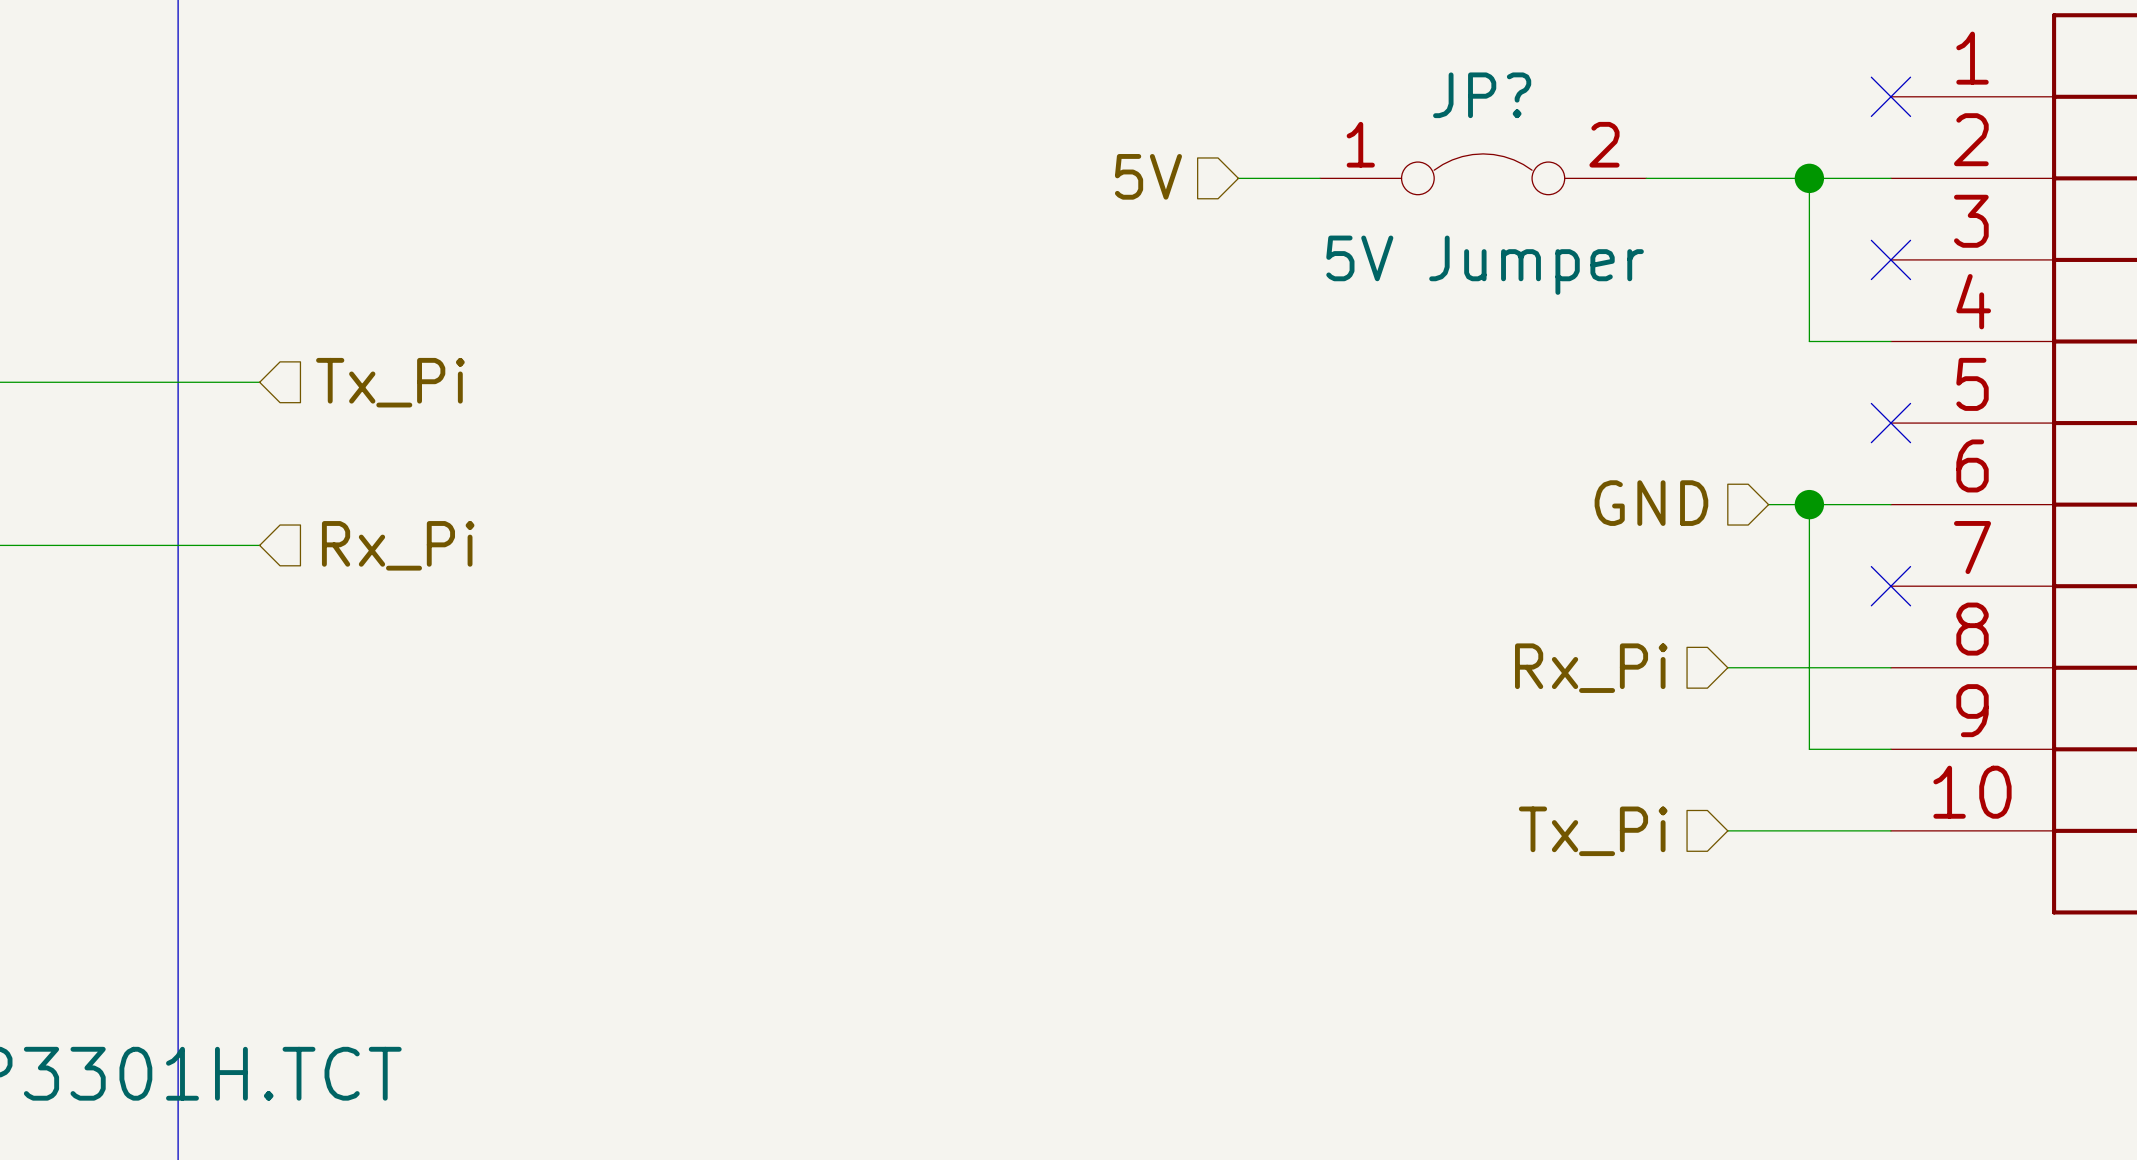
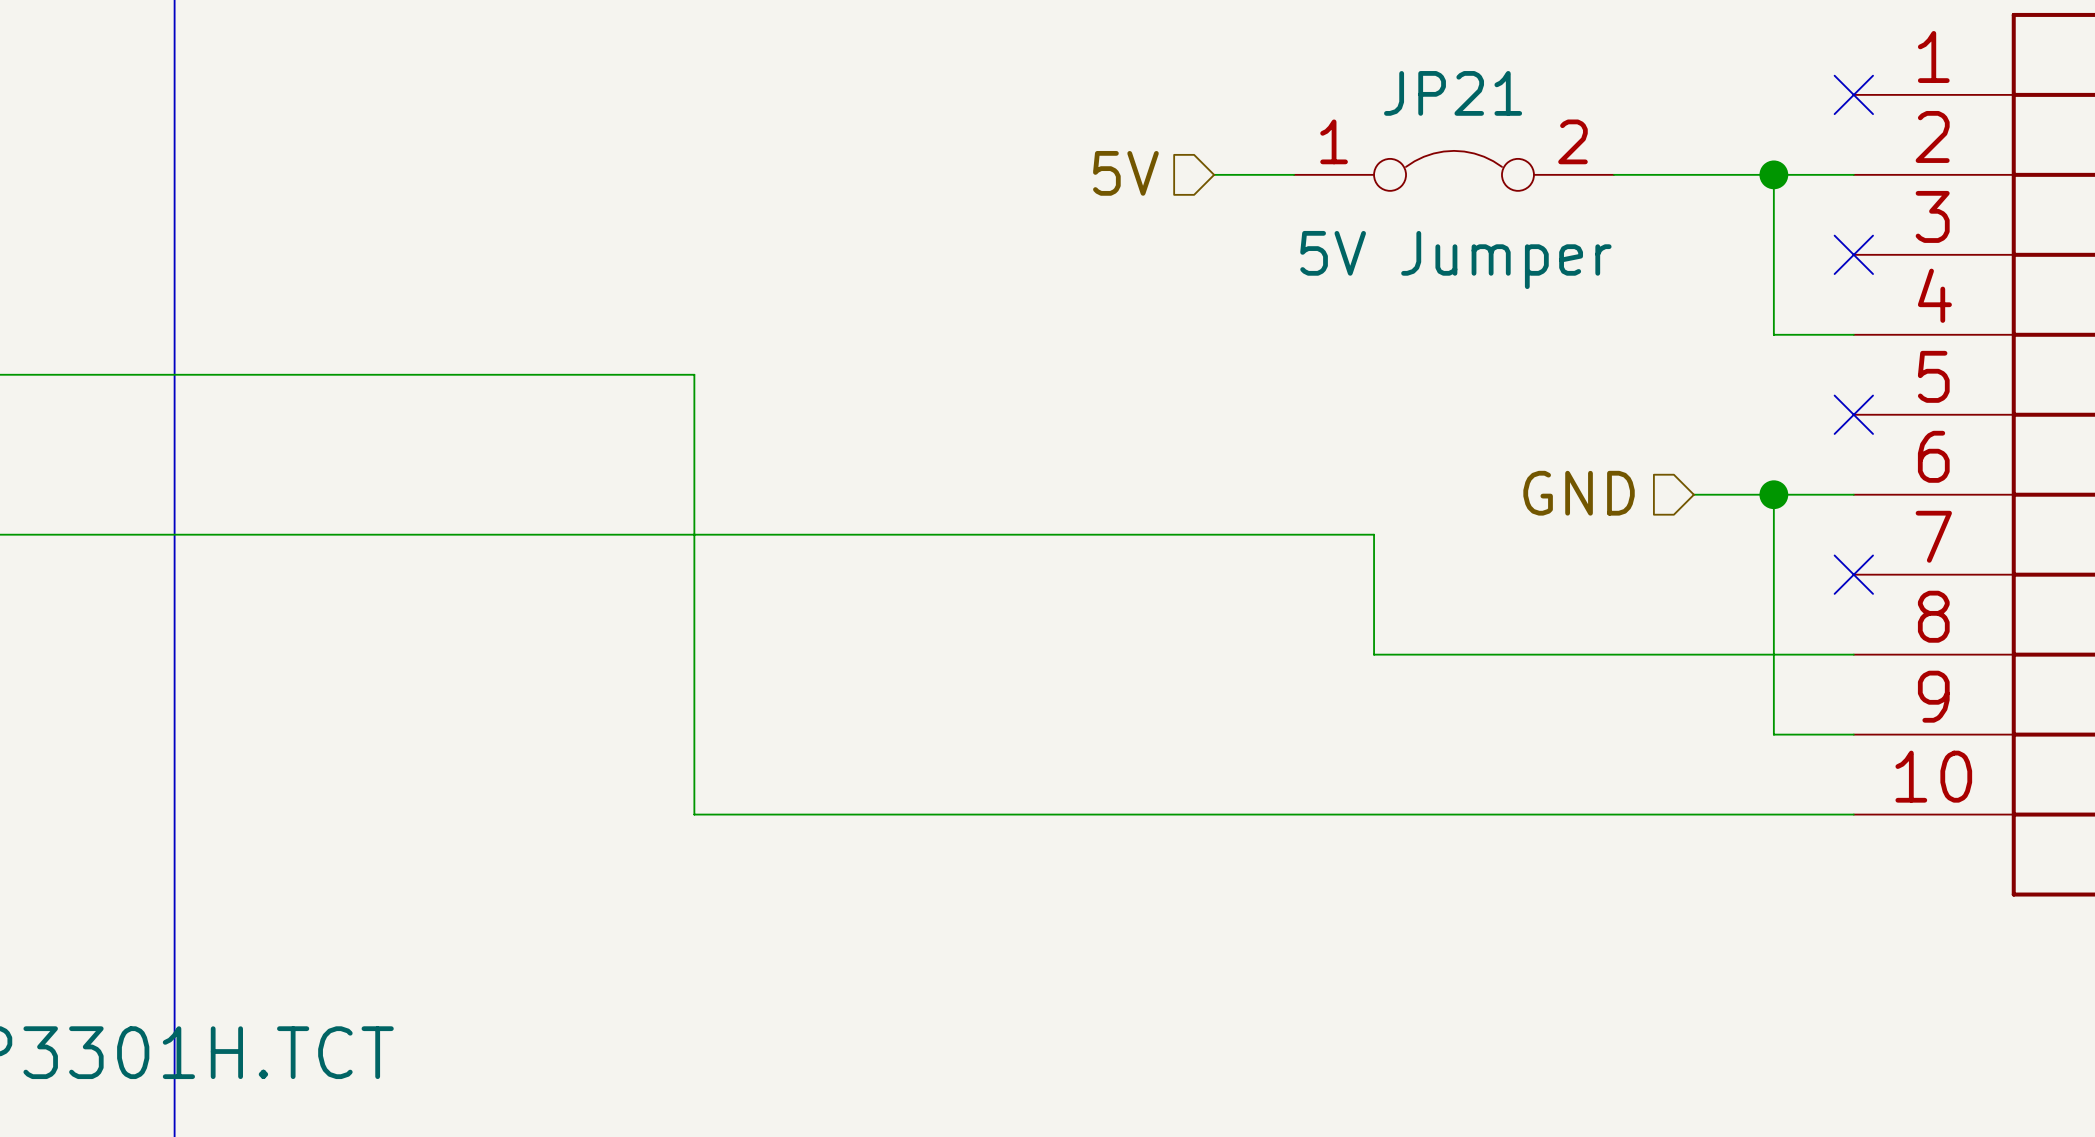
JP? name: JP? (1482, 95) -> JP21 (1453, 93)
wire: none -> (254, 374) (694, 374) (694, 814) (1693, 814)
hierarchical label: Tx_Pi (390, 382) -> none
hierarchical label position: GND (1651, 503) -> GND (1579, 493)
wire: none -> (1693, 494) (1733, 494)
wire: none -> (254, 534) (1374, 534) (1374, 654) (1693, 654)
hierarchical label: Rx_Pi (398, 545) -> none
hierarchical label: Rx_Pi (1591, 668) -> none
hierarchical label: Tx_Pi (1593, 831) -> none

